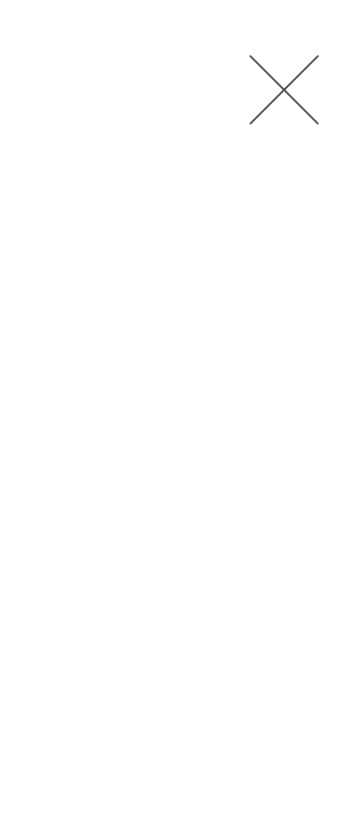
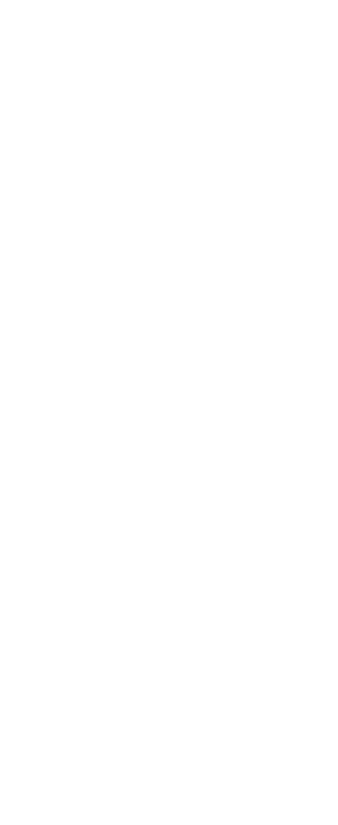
no-connect mark: (284, 89) -> none

